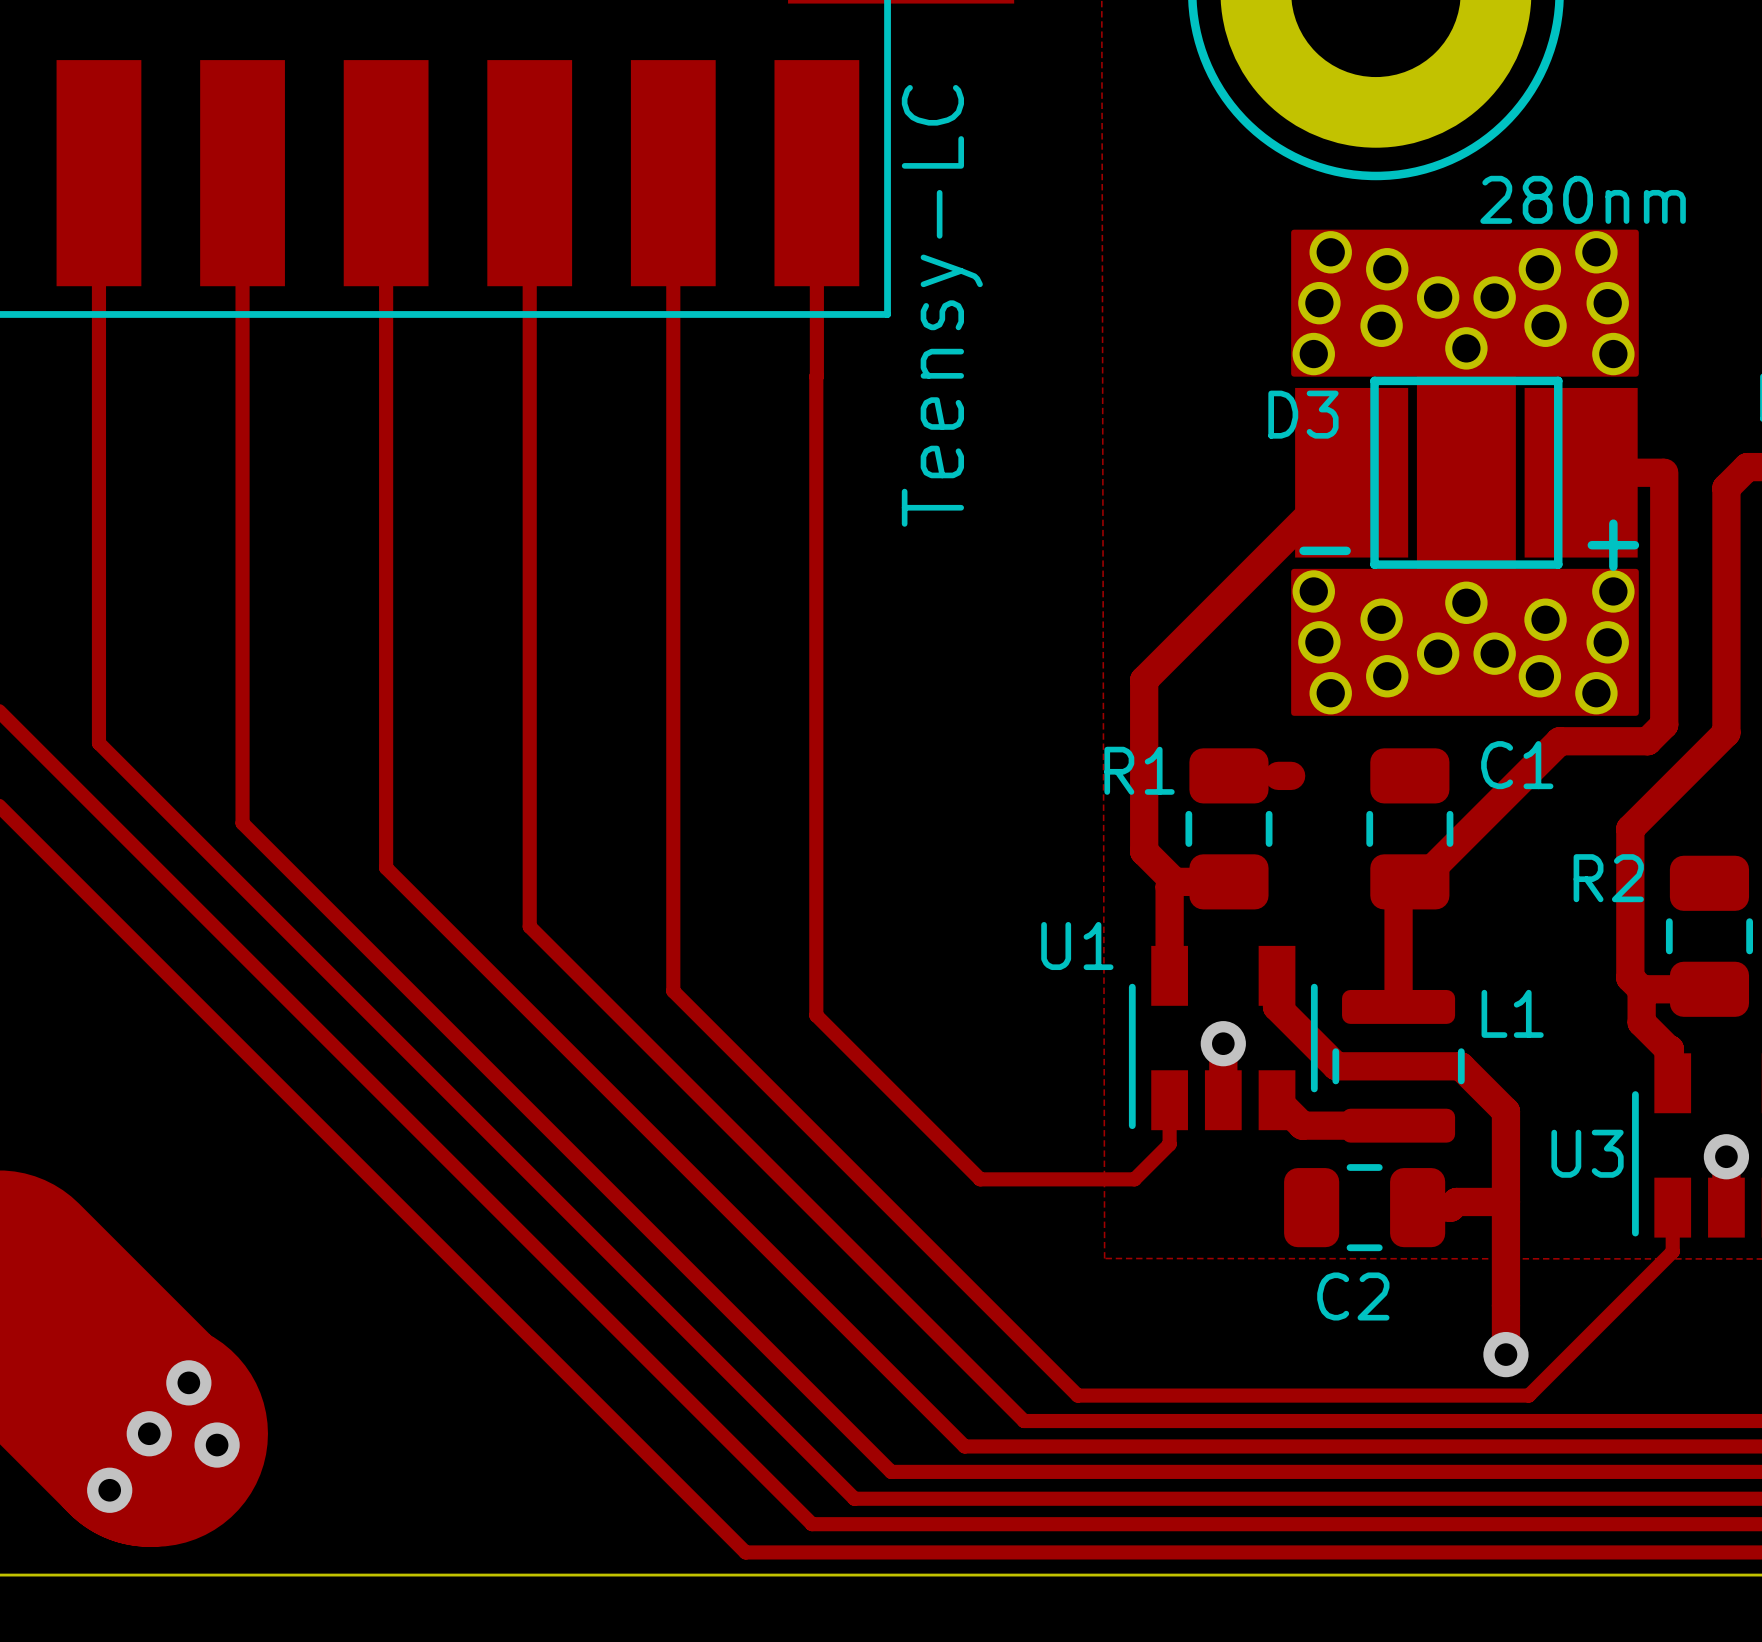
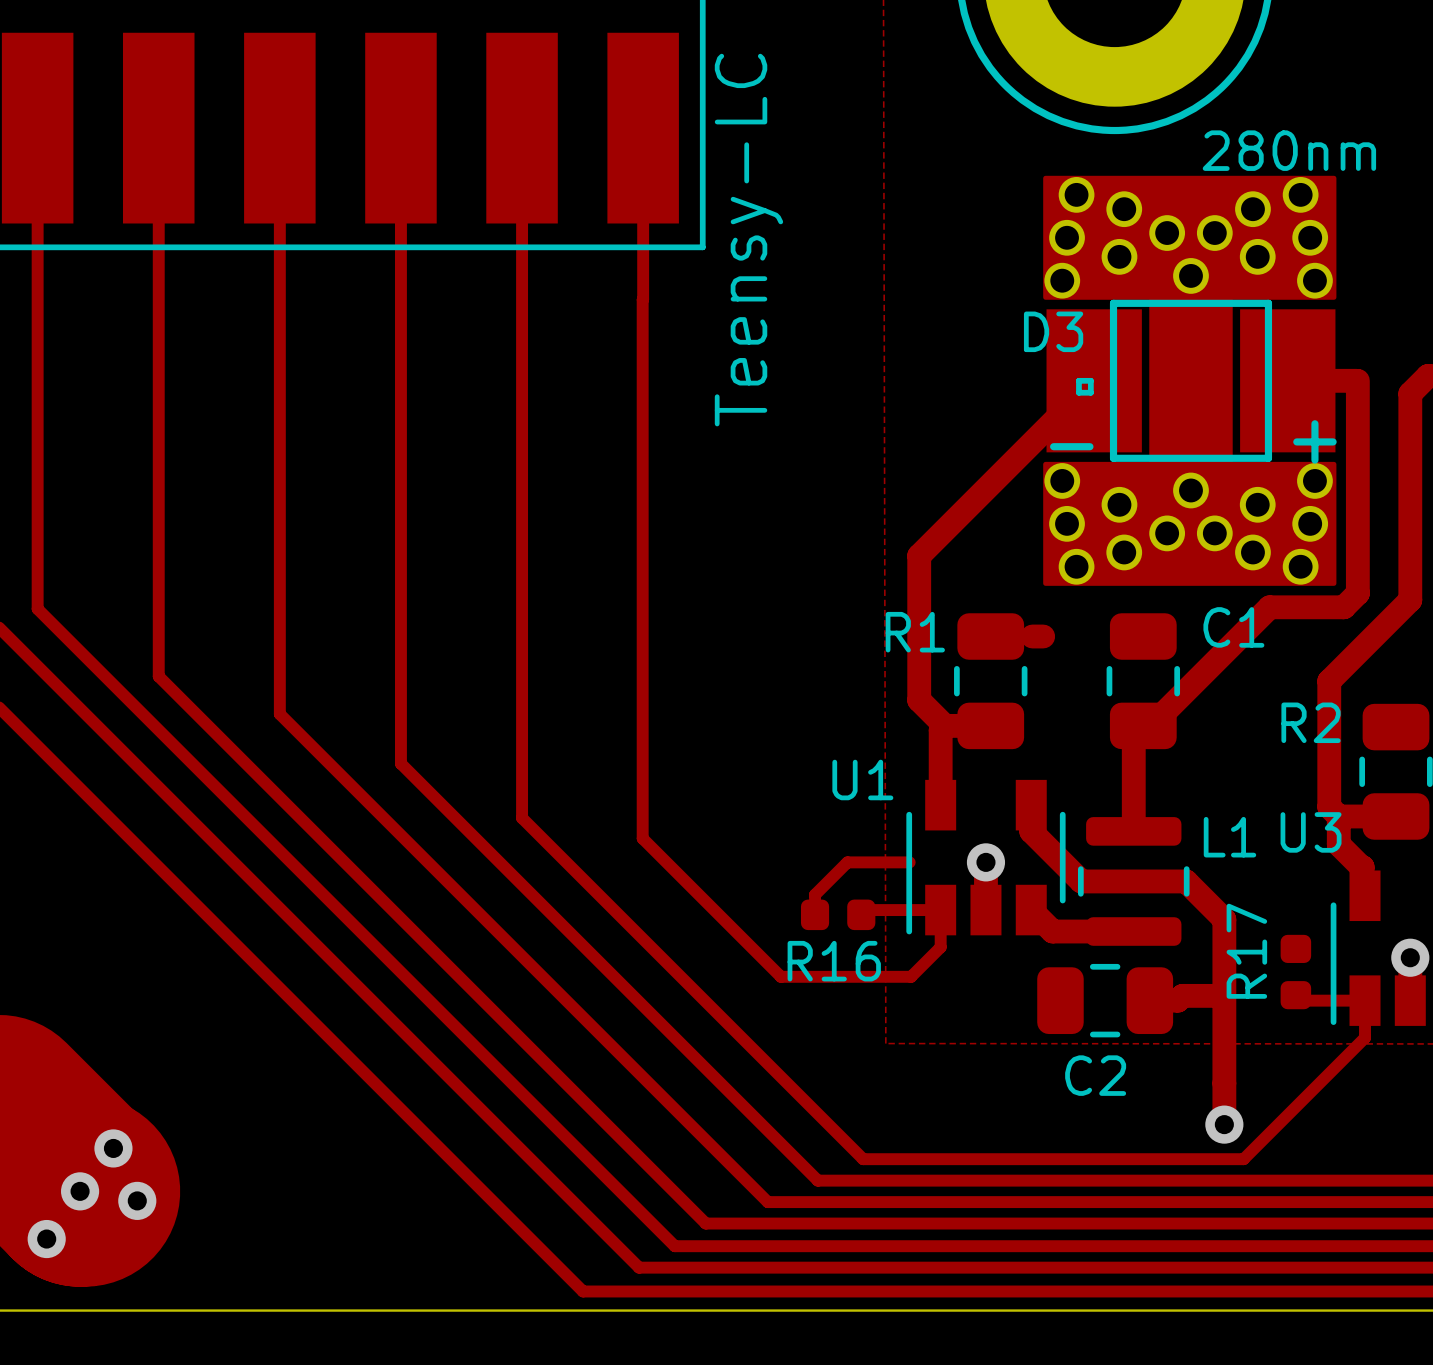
line: none -> (1078, 380) (1078, 392) (1090, 392) (1090, 380) (1078, 380)
track: none -> (909, 862) (847, 862) (815, 894) (815, 914)
track: none -> (940, 910) (866, 910) (861, 914)
R16: none -> (838, 914)
U3 name position: U3 (1587, 1153) -> U3 (1311, 832)
R17: none -> (1295, 972)
track: none -> (1295, 995) (1301, 1000) (1365, 1000)

